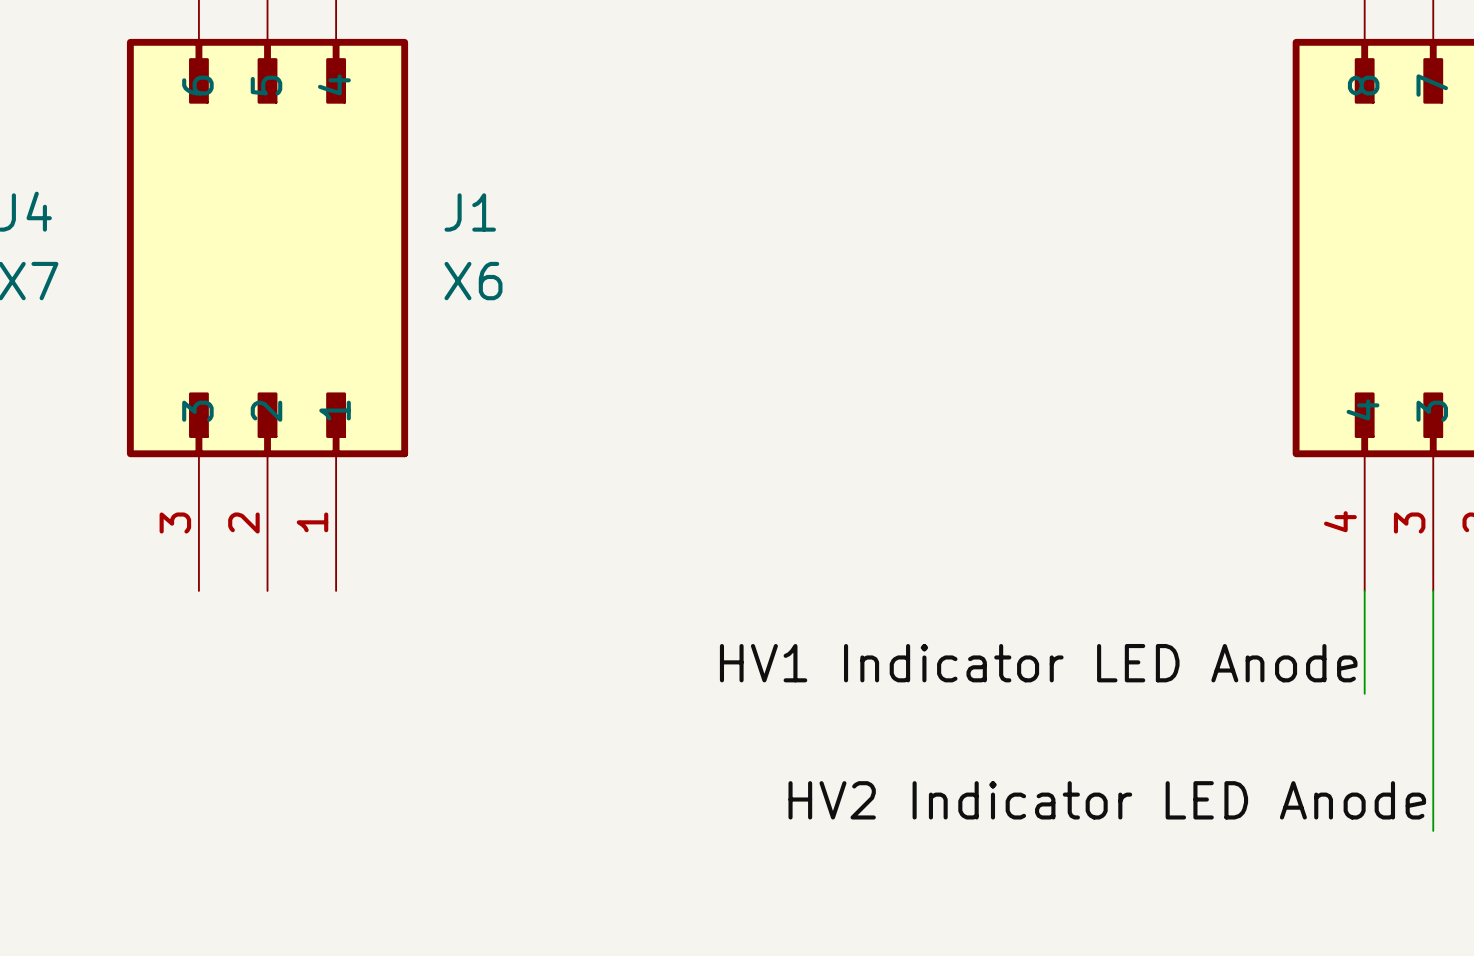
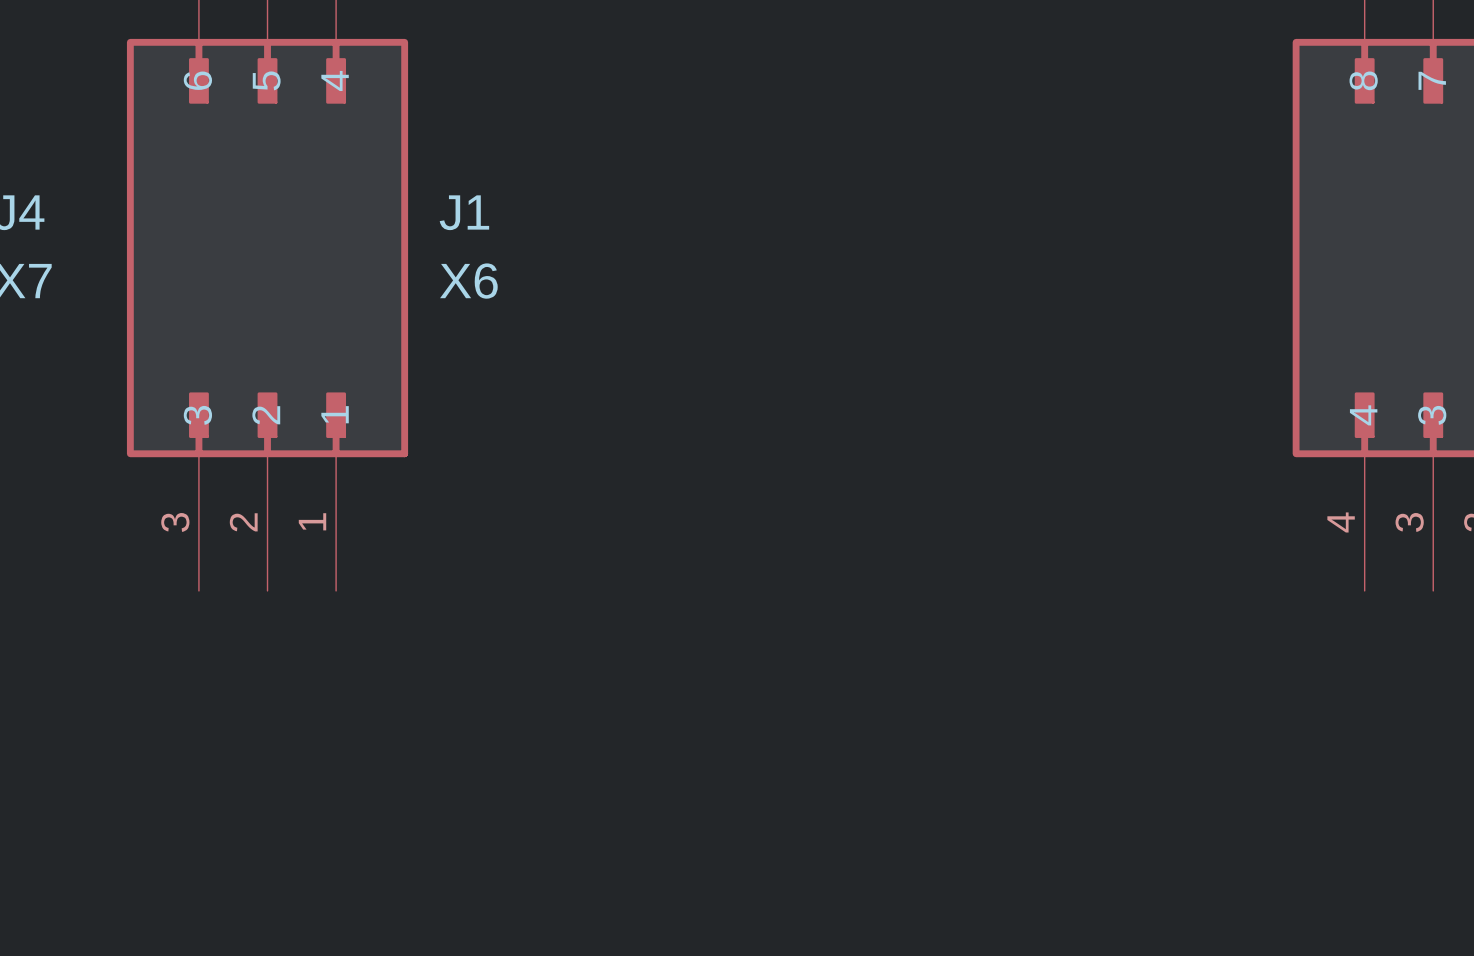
wire: (1364, 590) (1364, 693) -> none
wire: (1433, 590) (1433, 830) -> none
label: HV1 Indicator LED Anode (1038, 663) -> none
label: HV2 Indicator LED Anode (1107, 800) -> none

